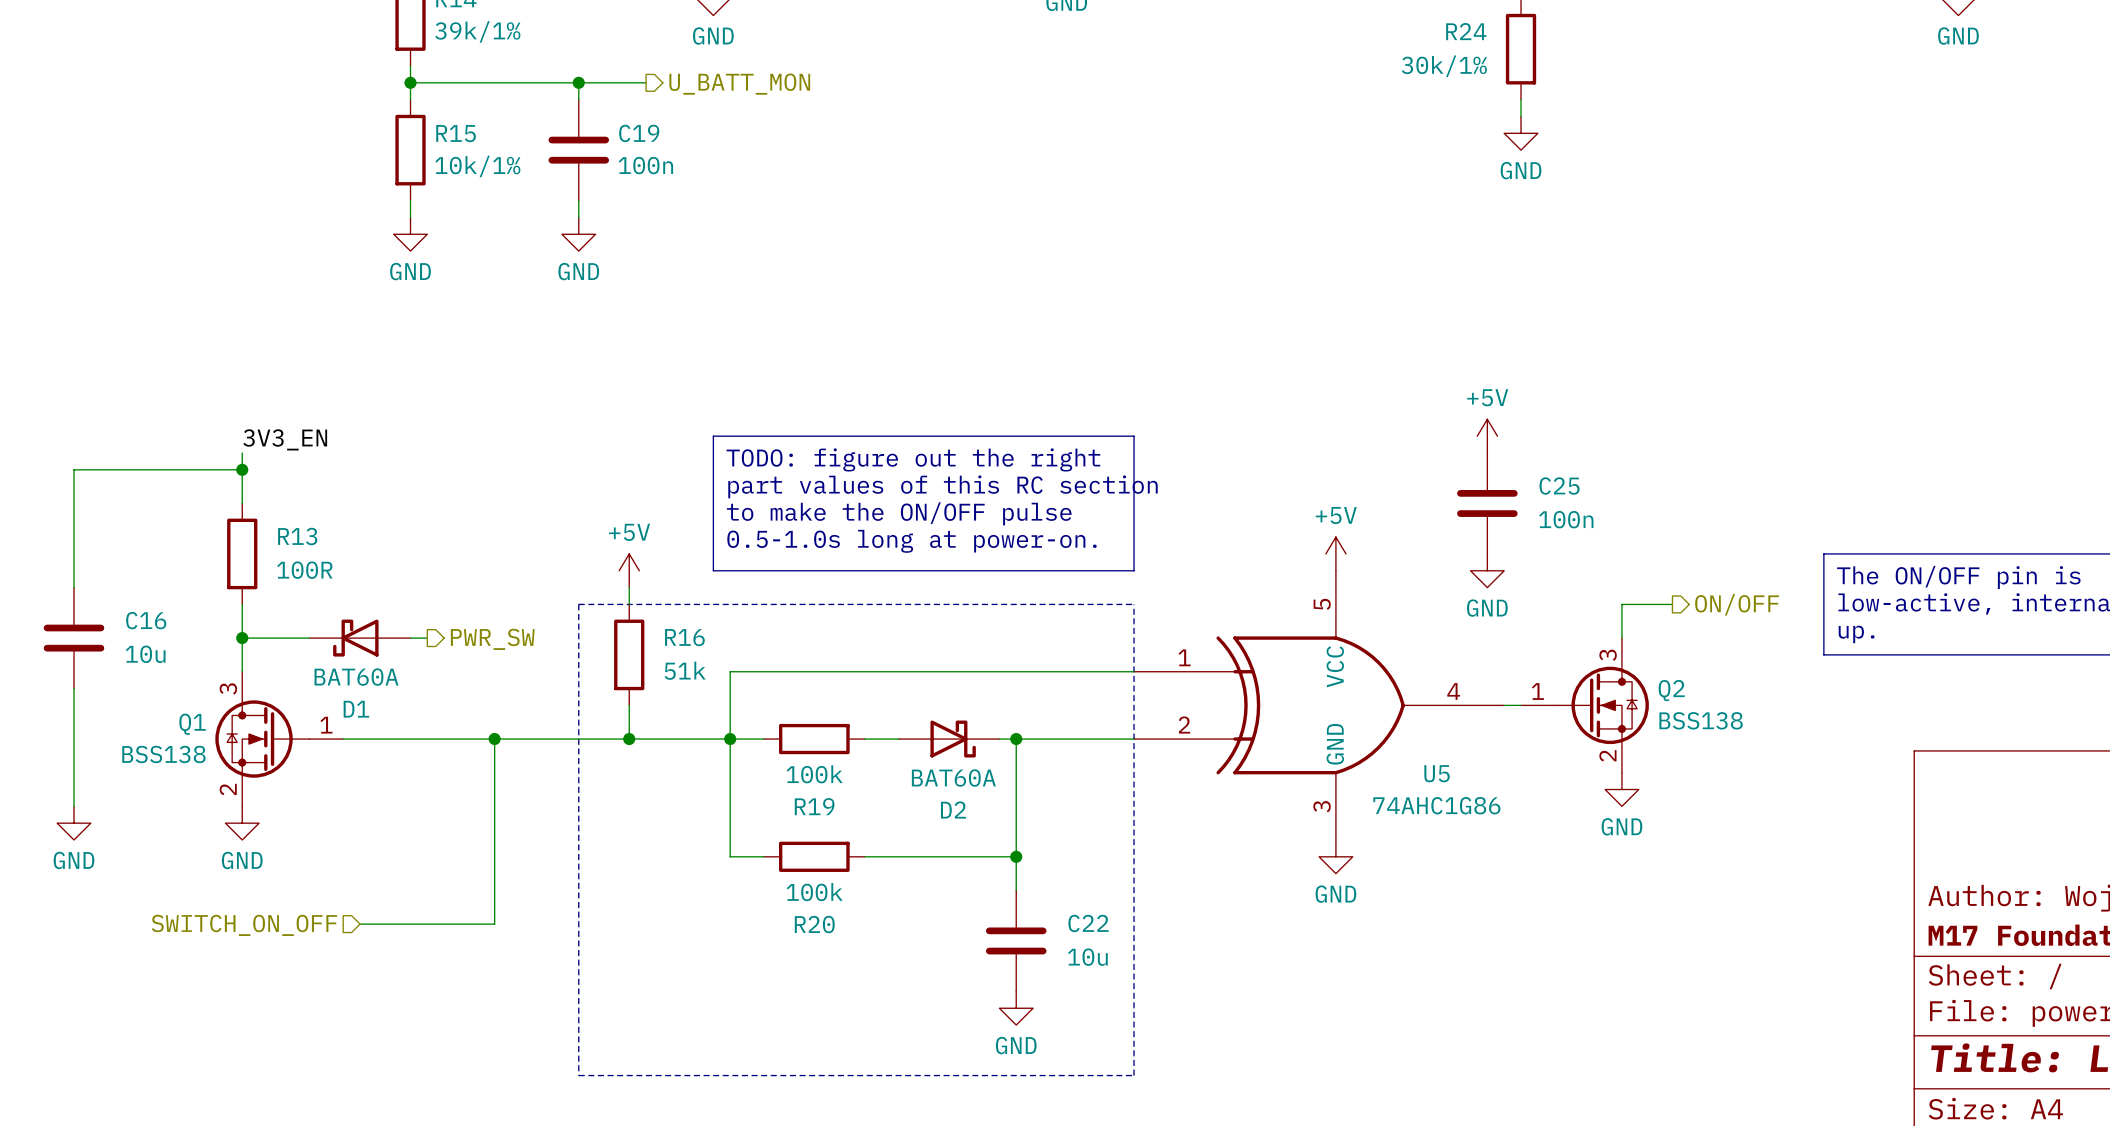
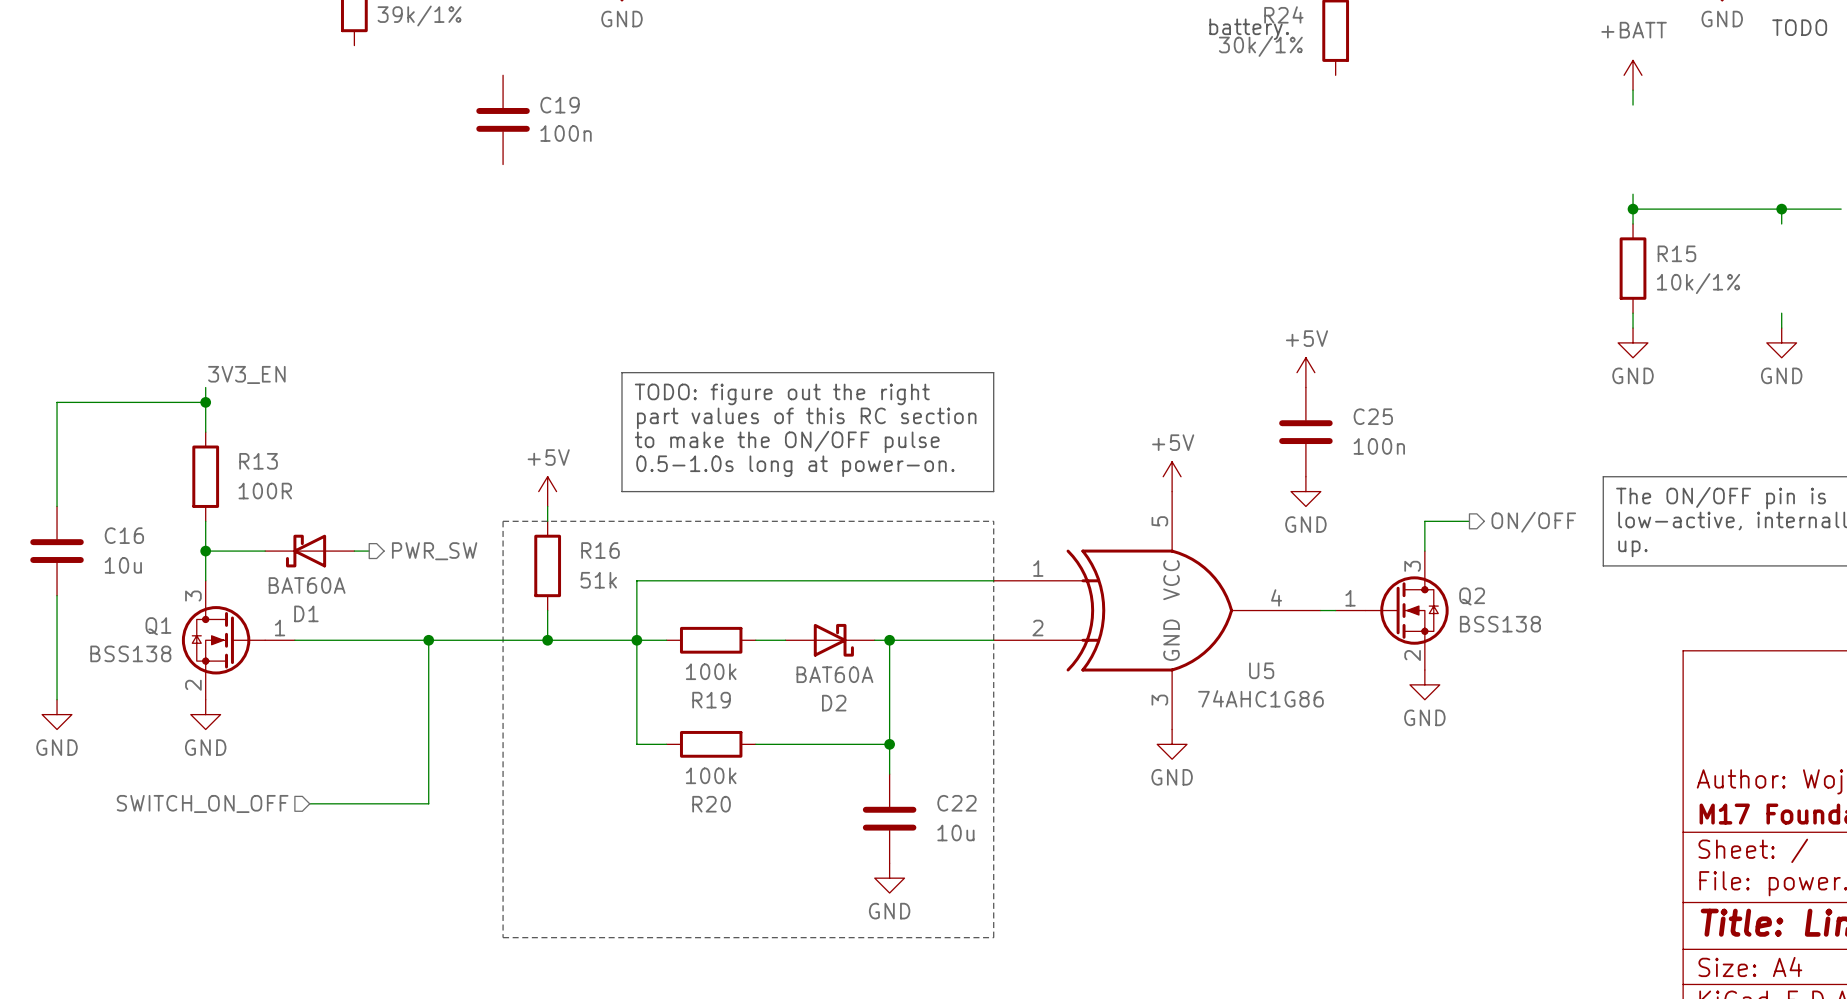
text: none -> TODO (1799, 27)
text: none -> battery. (1249, 29)
wire: (410, 66) (410, 99) -> none
wire: (410, 82) (646, 82) -> none
junction: (410, 82) -> none
wire: (578, 82) (578, 99) -> none
junction: (578, 82) -> none
hierarchical label: U_BATT_MON (739, 84) -> none
wire: (1521, 99) (1521, 116) -> none
power symbol: none -> +BATT (1633, 75)
wire: none -> (1633, 90) (1633, 105)
power symbol: GND (1521, 133) -> none
R15 position: (410, 150) -> (1633, 268)
wire: (410, 200) (410, 217) -> none
wire: (578, 200) (578, 217) -> none
power symbol: GND (410, 234) -> none
power symbol: GND (578, 234) -> none
wire: none -> (1633, 194) (1633, 223)
wire: none -> (1633, 209) (1841, 209)
junction: none -> (1633, 209)
wire: none -> (1781, 209) (1781, 223)
junction: none -> (1781, 209)
wire: none -> (1633, 313) (1633, 328)
wire: none -> (1781, 313) (1781, 328)
power symbol: none -> GND (1633, 342)
power symbol: none -> GND (1781, 342)

